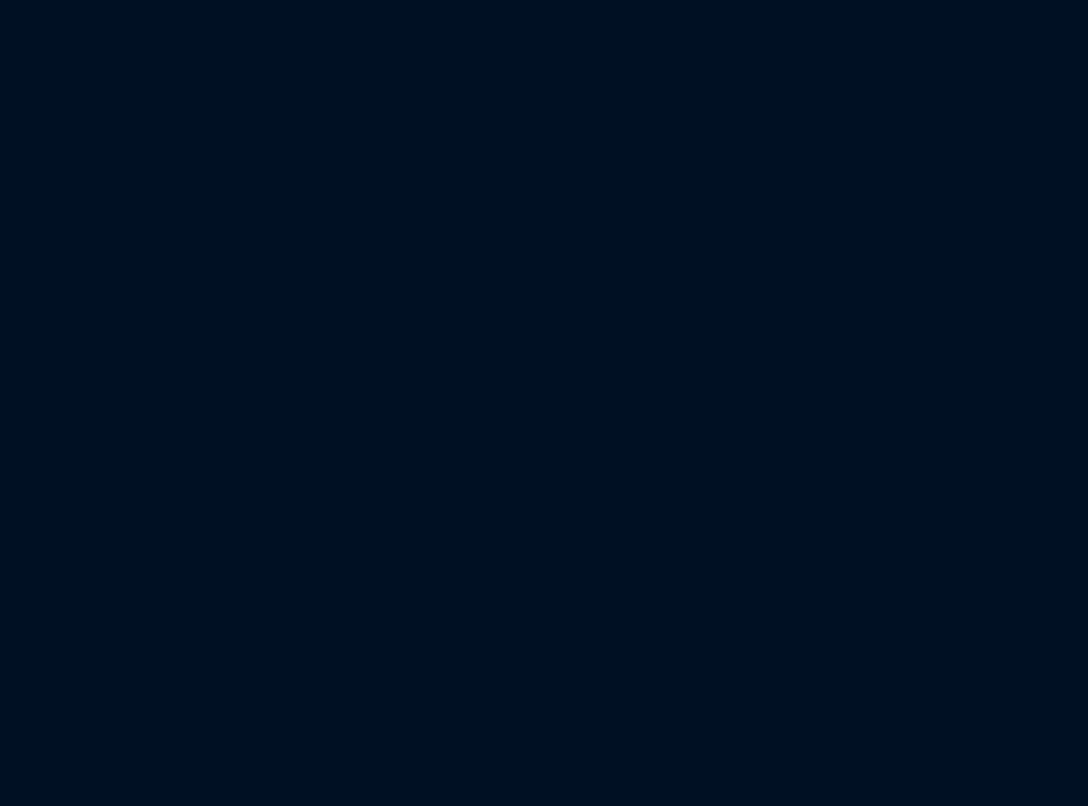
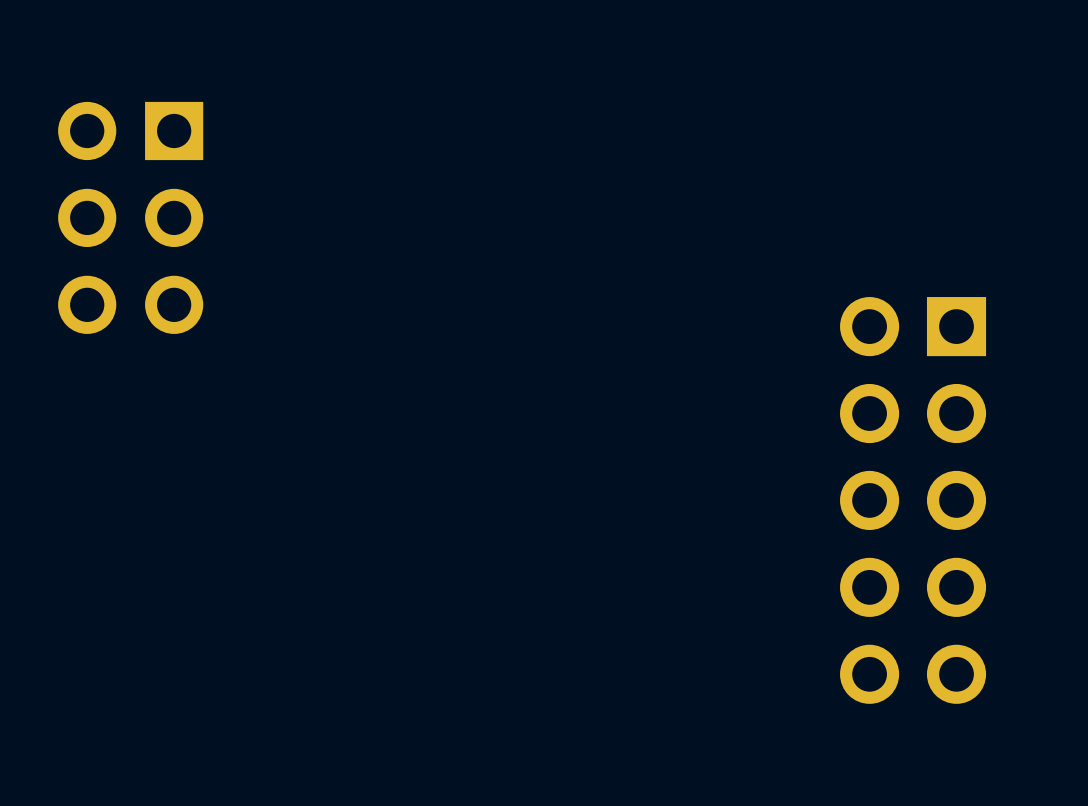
part: none -> (130, 217)
part: none -> (913, 500)

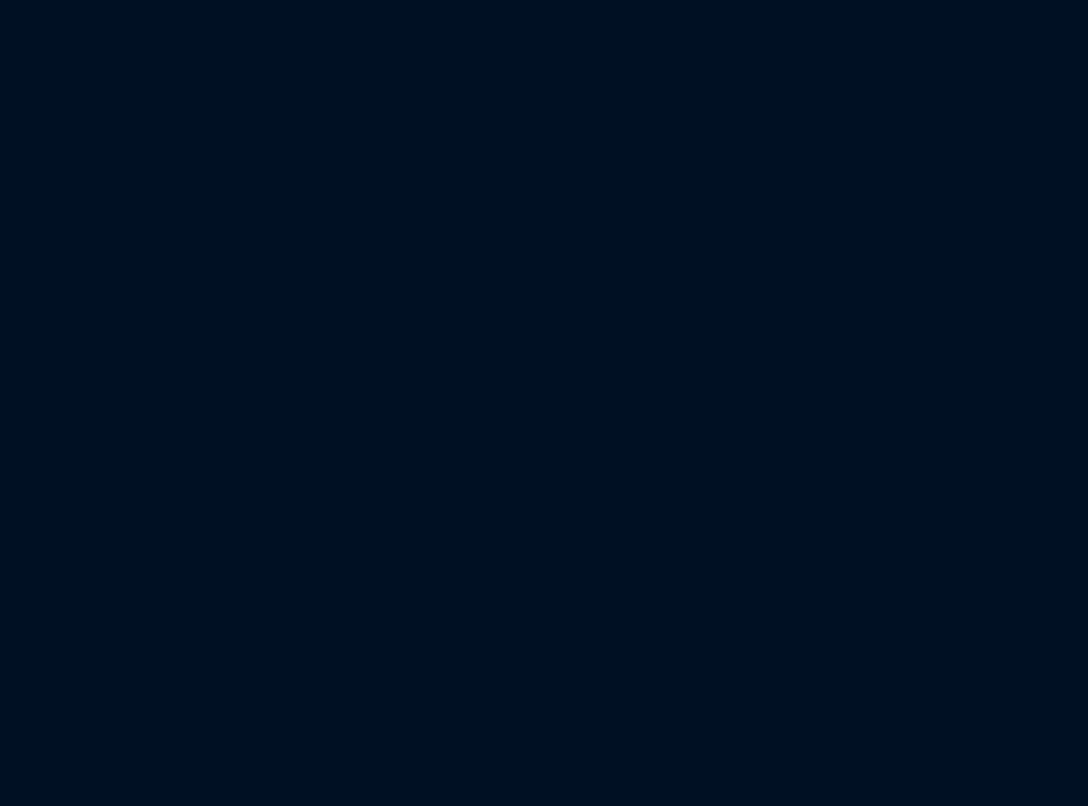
part: (130, 217) -> none
part: (913, 500) -> none

